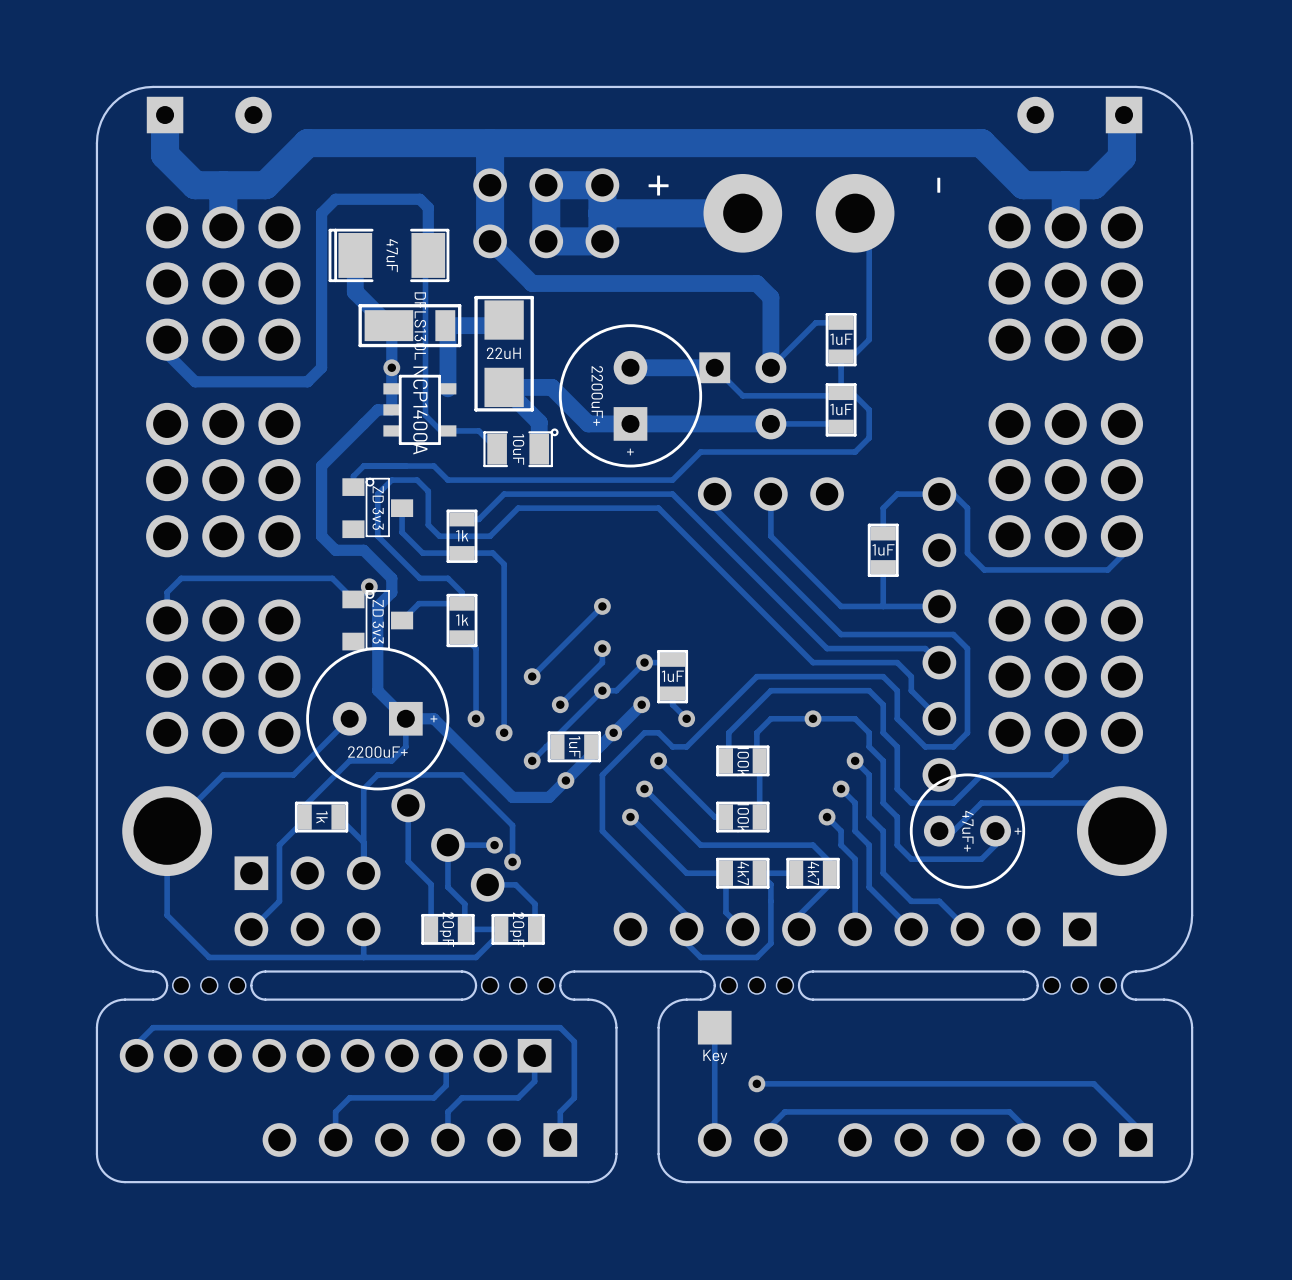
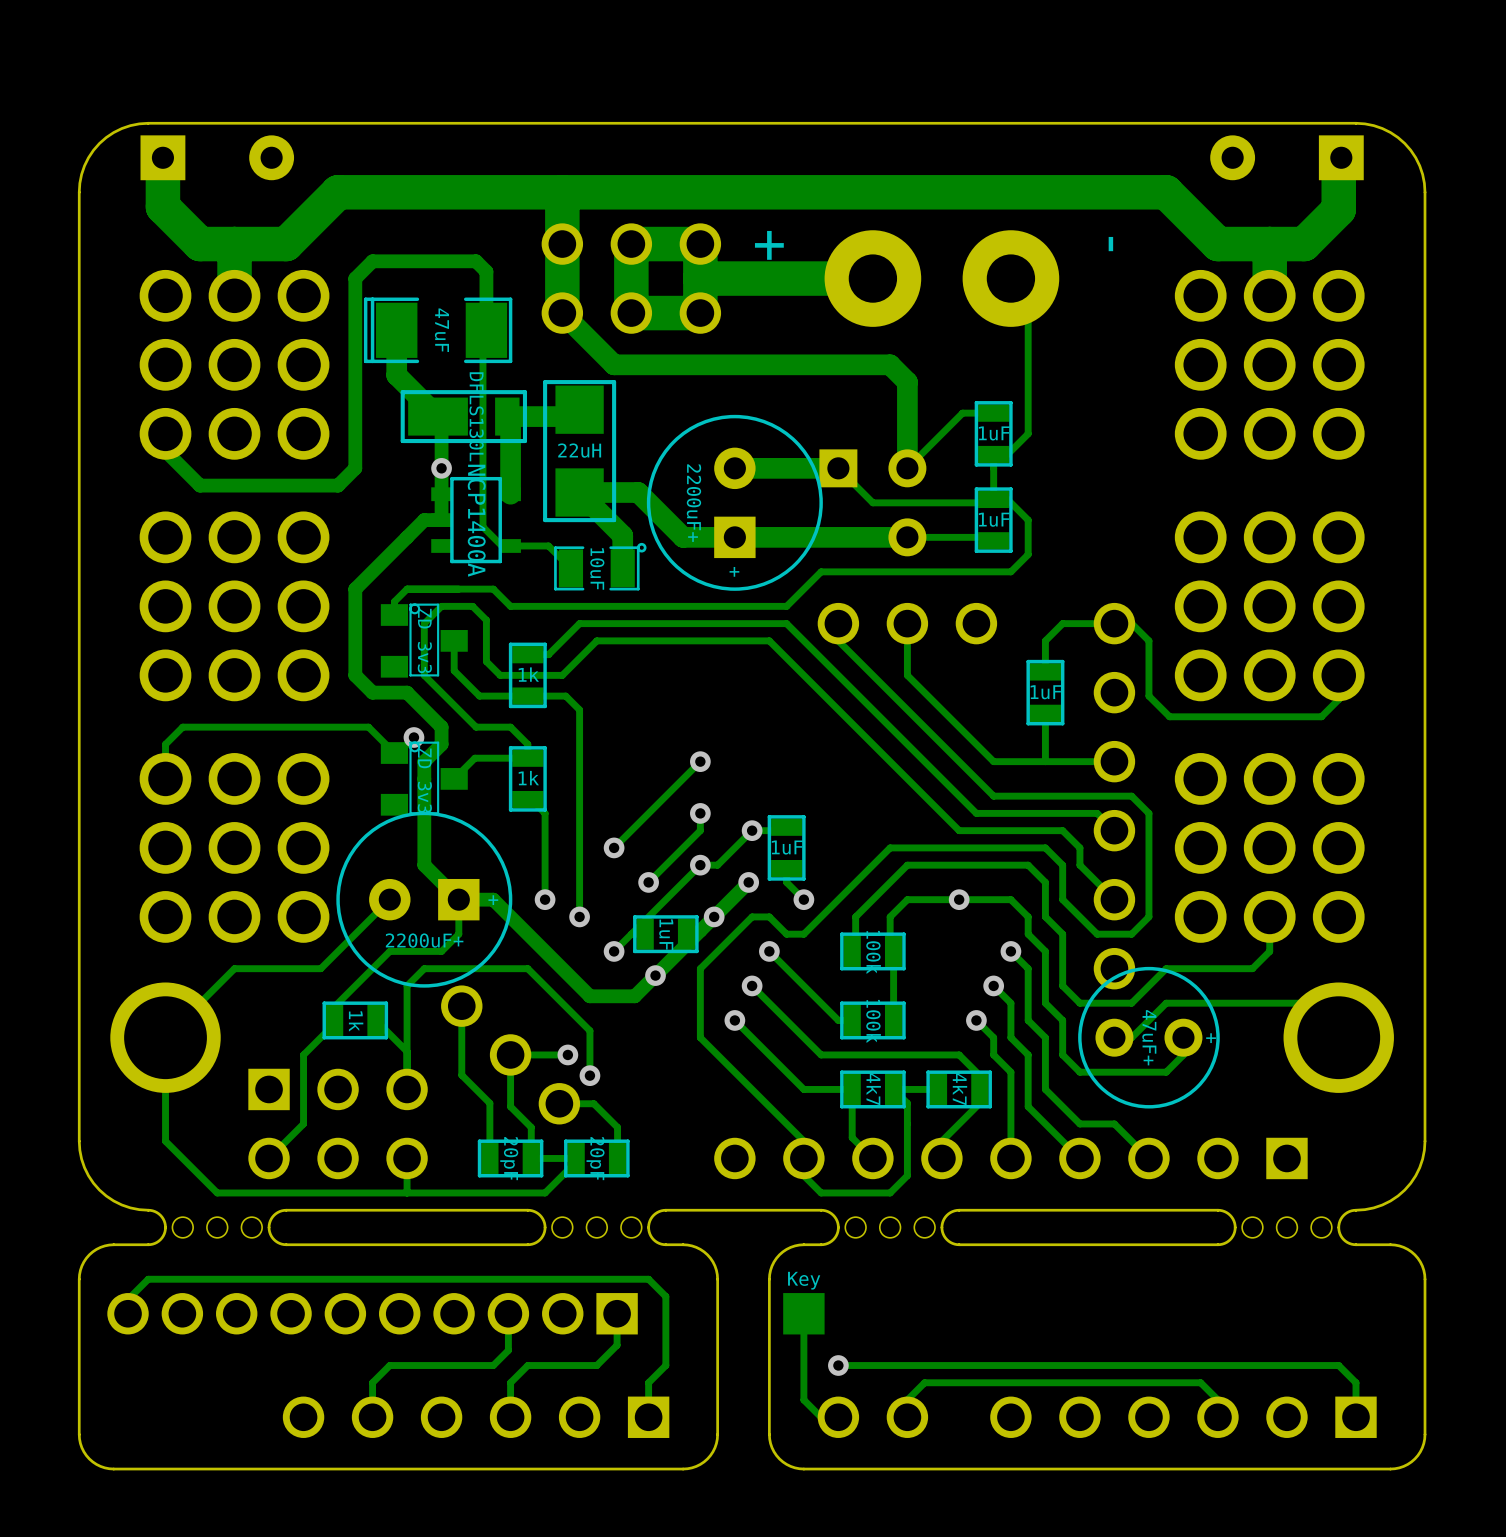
track: (714, 1027) (714, 1140) -> (803, 1313) (803, 1400) (821, 1417) (838, 1417)
part position: (714, 1027) -> (803, 1313)
text position: Key (715, 1056) -> Key (804, 1280)
track: (756, 1083) (1093, 1083) (1135, 1125) -> (838, 1365) (1338, 1365) (1355, 1382) (1355, 1400)
via position: (756, 1083) -> (838, 1365)

